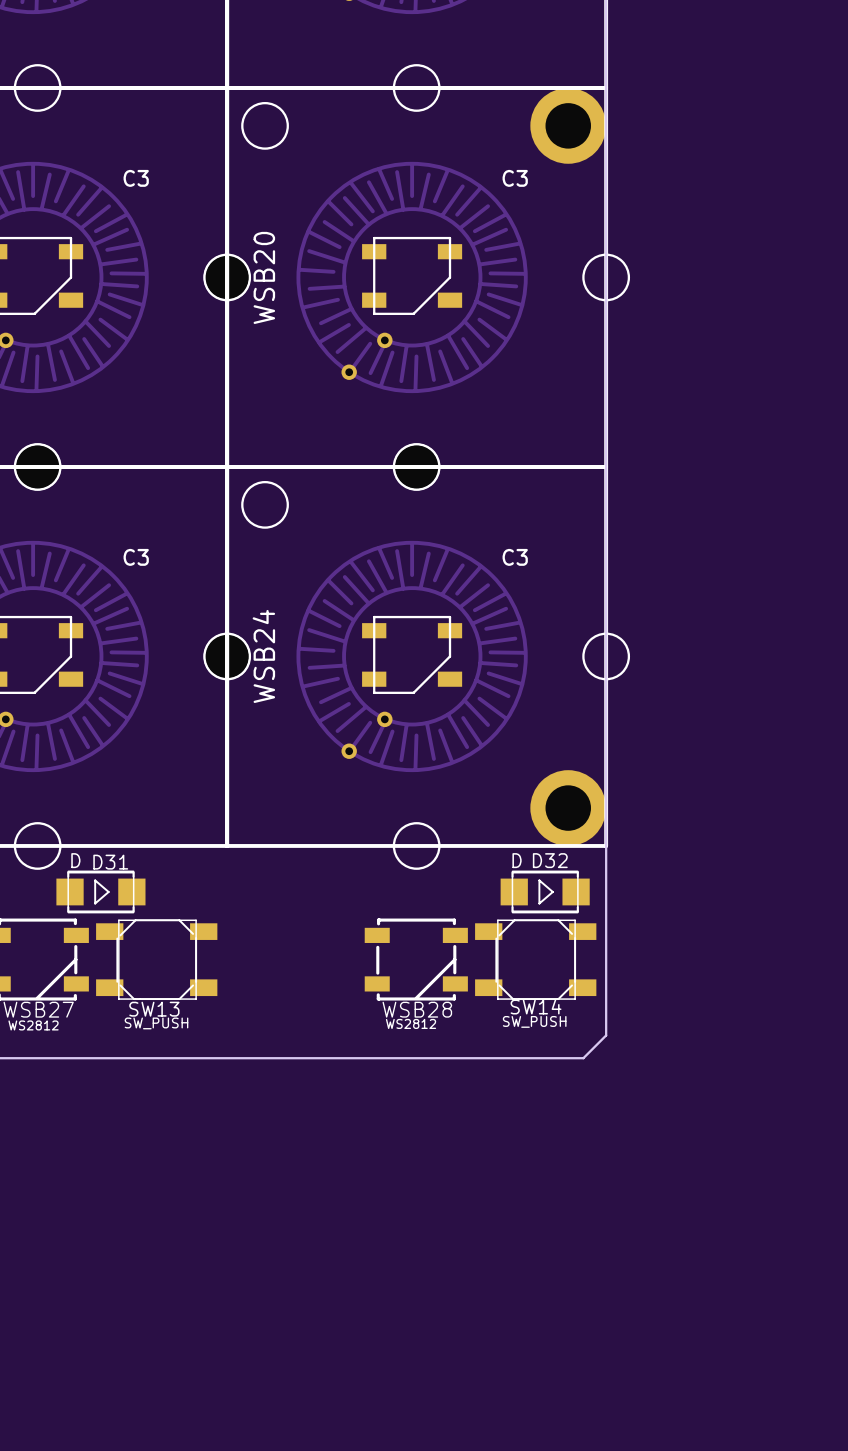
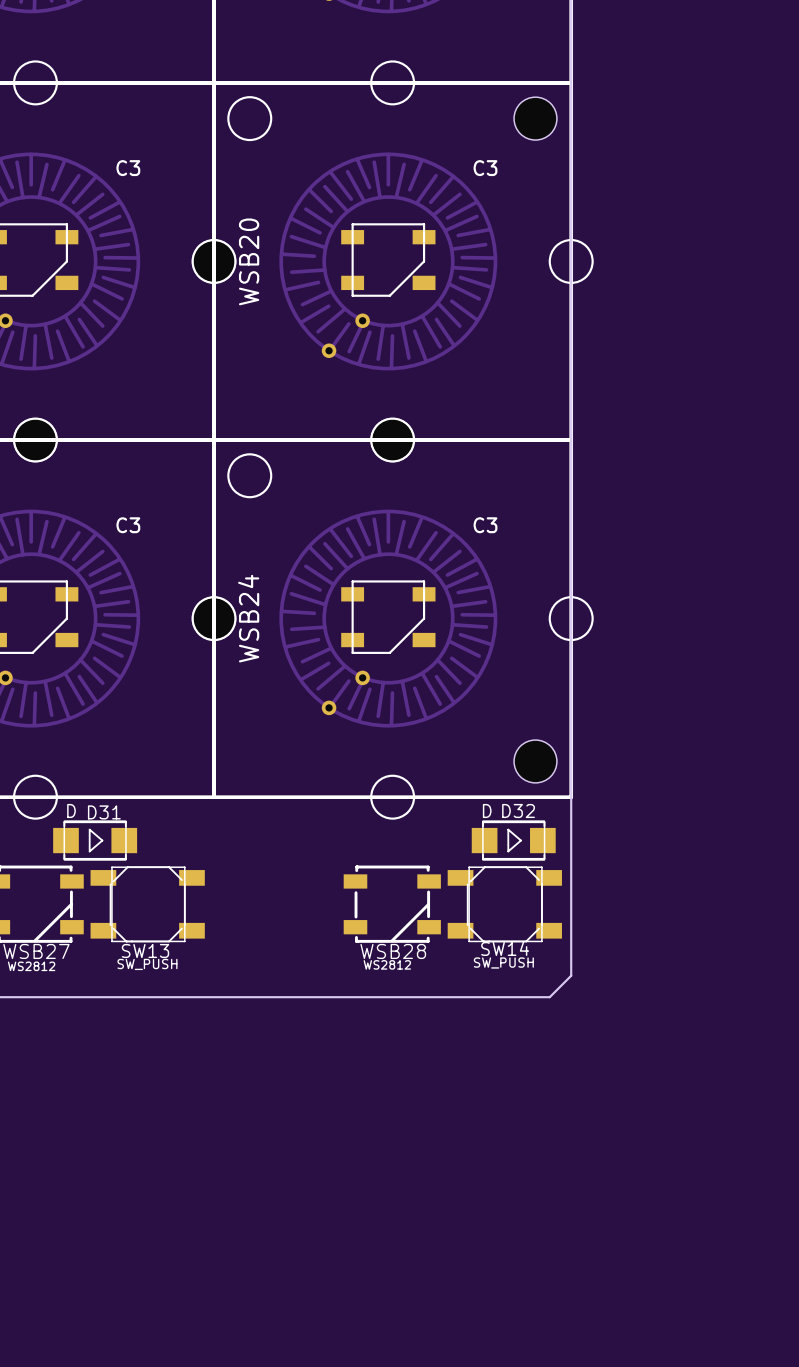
part footprint: [530, 87, 607, 164] -> [514, 97, 557, 141]
part footprint: [530, 770, 607, 846] -> [514, 740, 557, 783]

